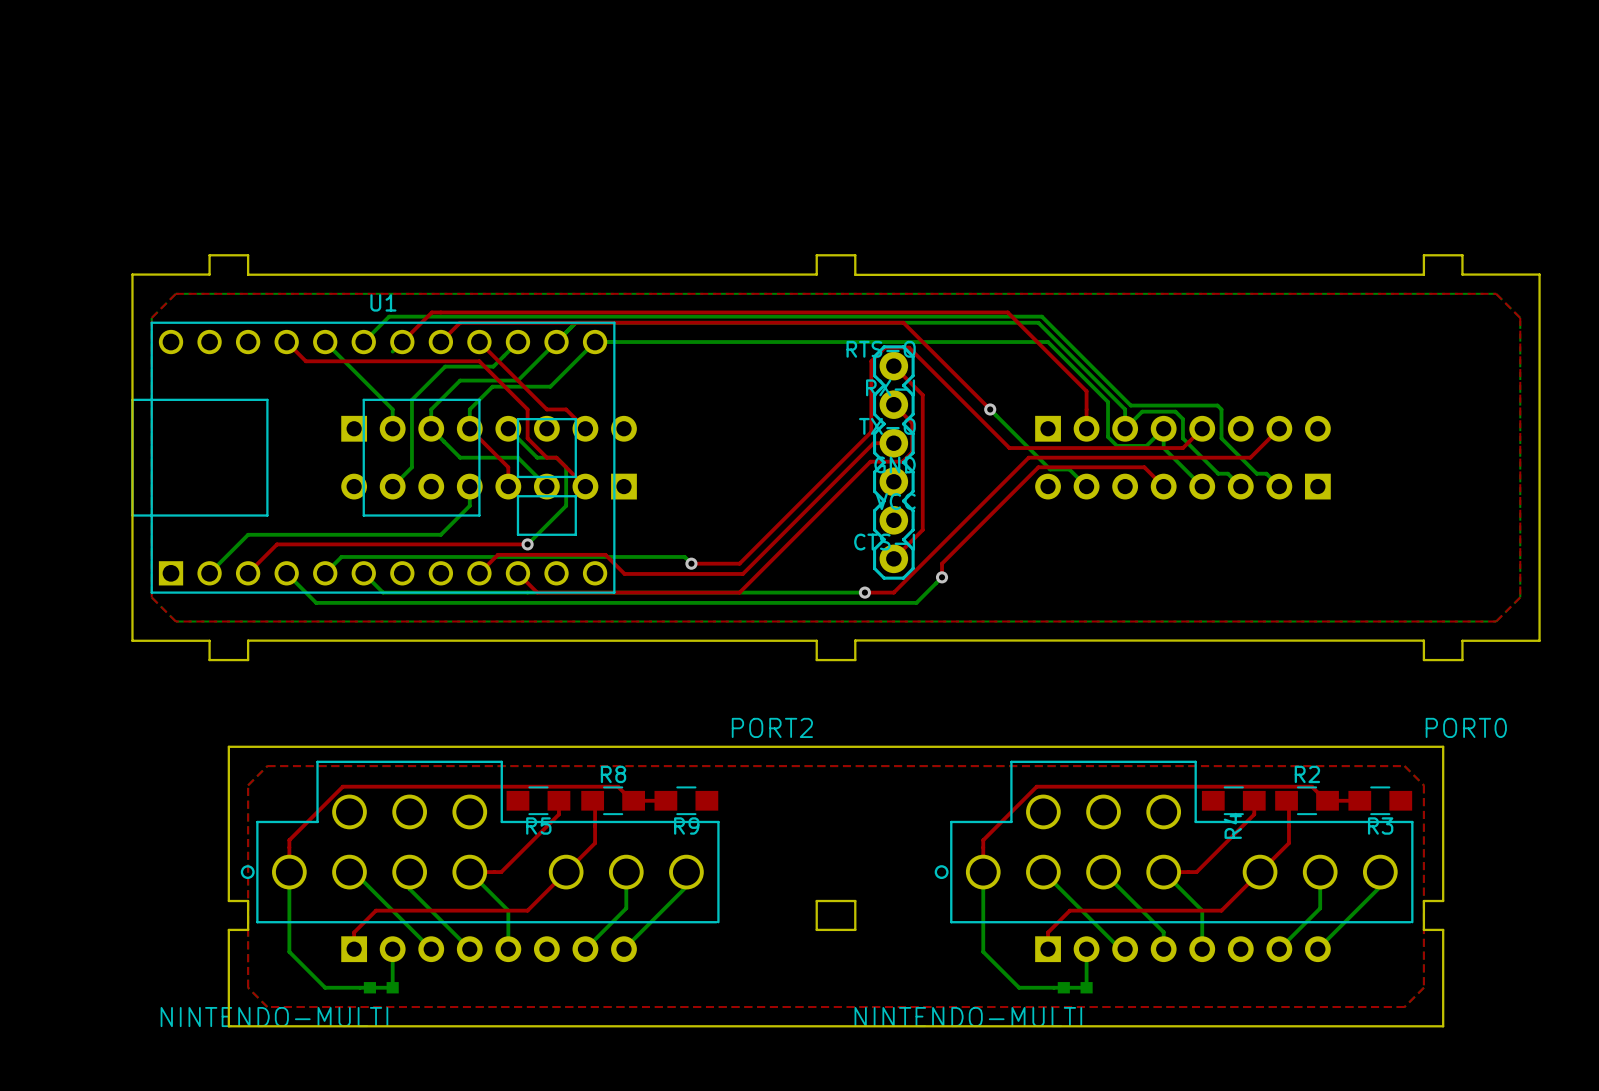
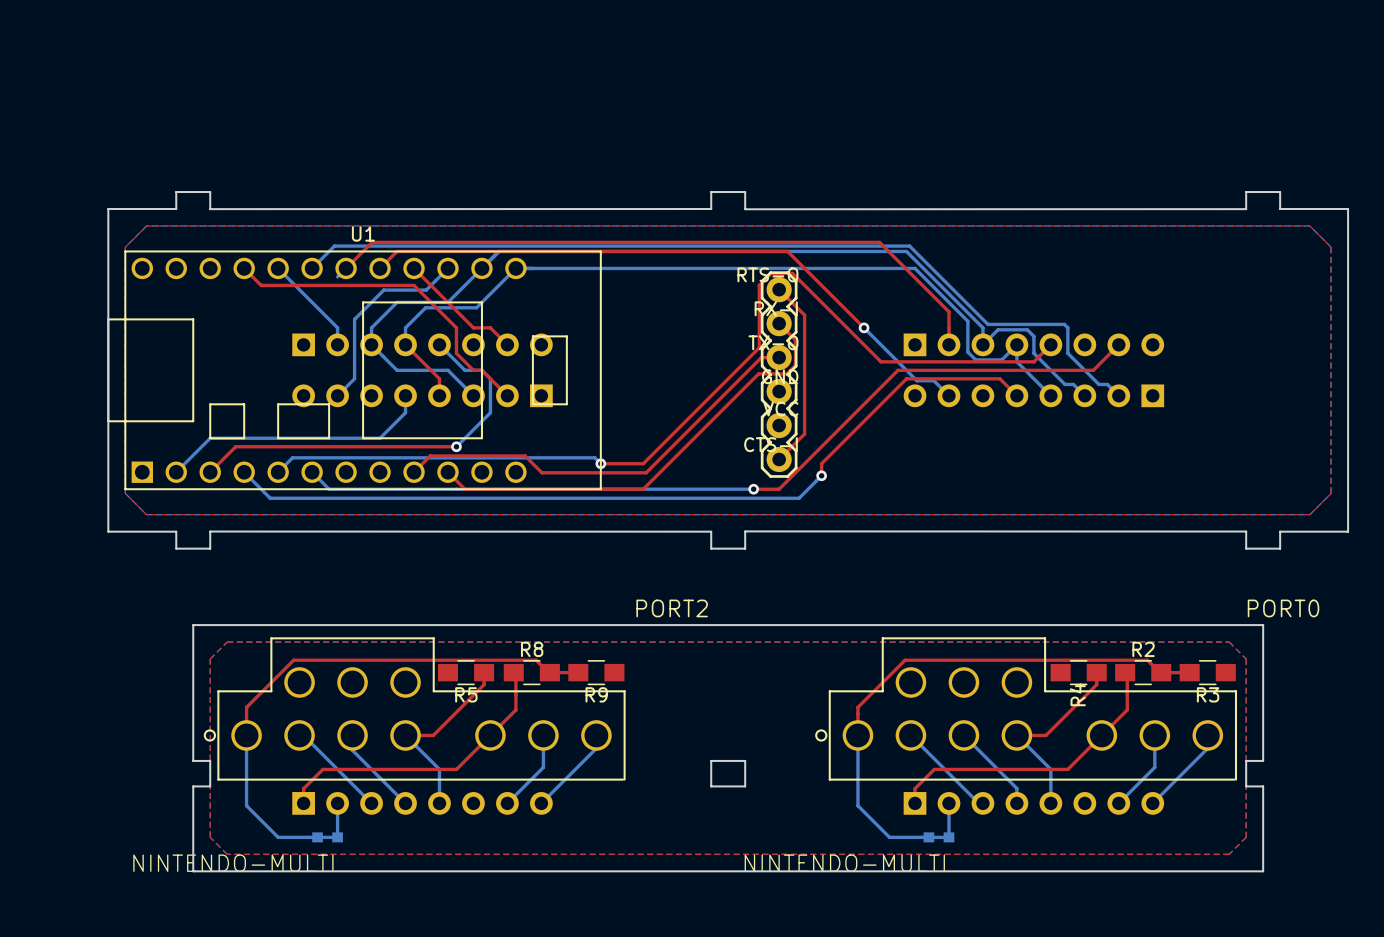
U1 footprint: [131, 321, 616, 594] -> [107, 250, 602, 491]

